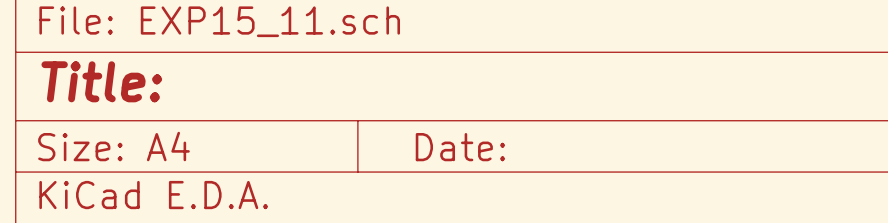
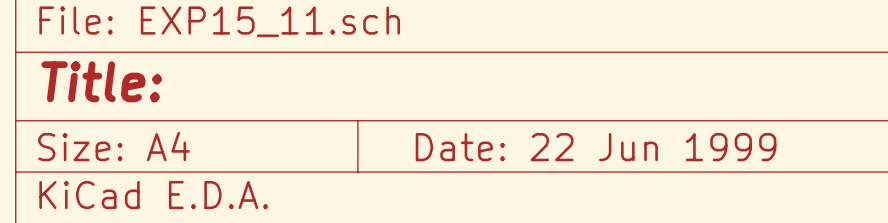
title block: Date: (460, 147) -> Date: 22 Jun 1999 (596, 147)

